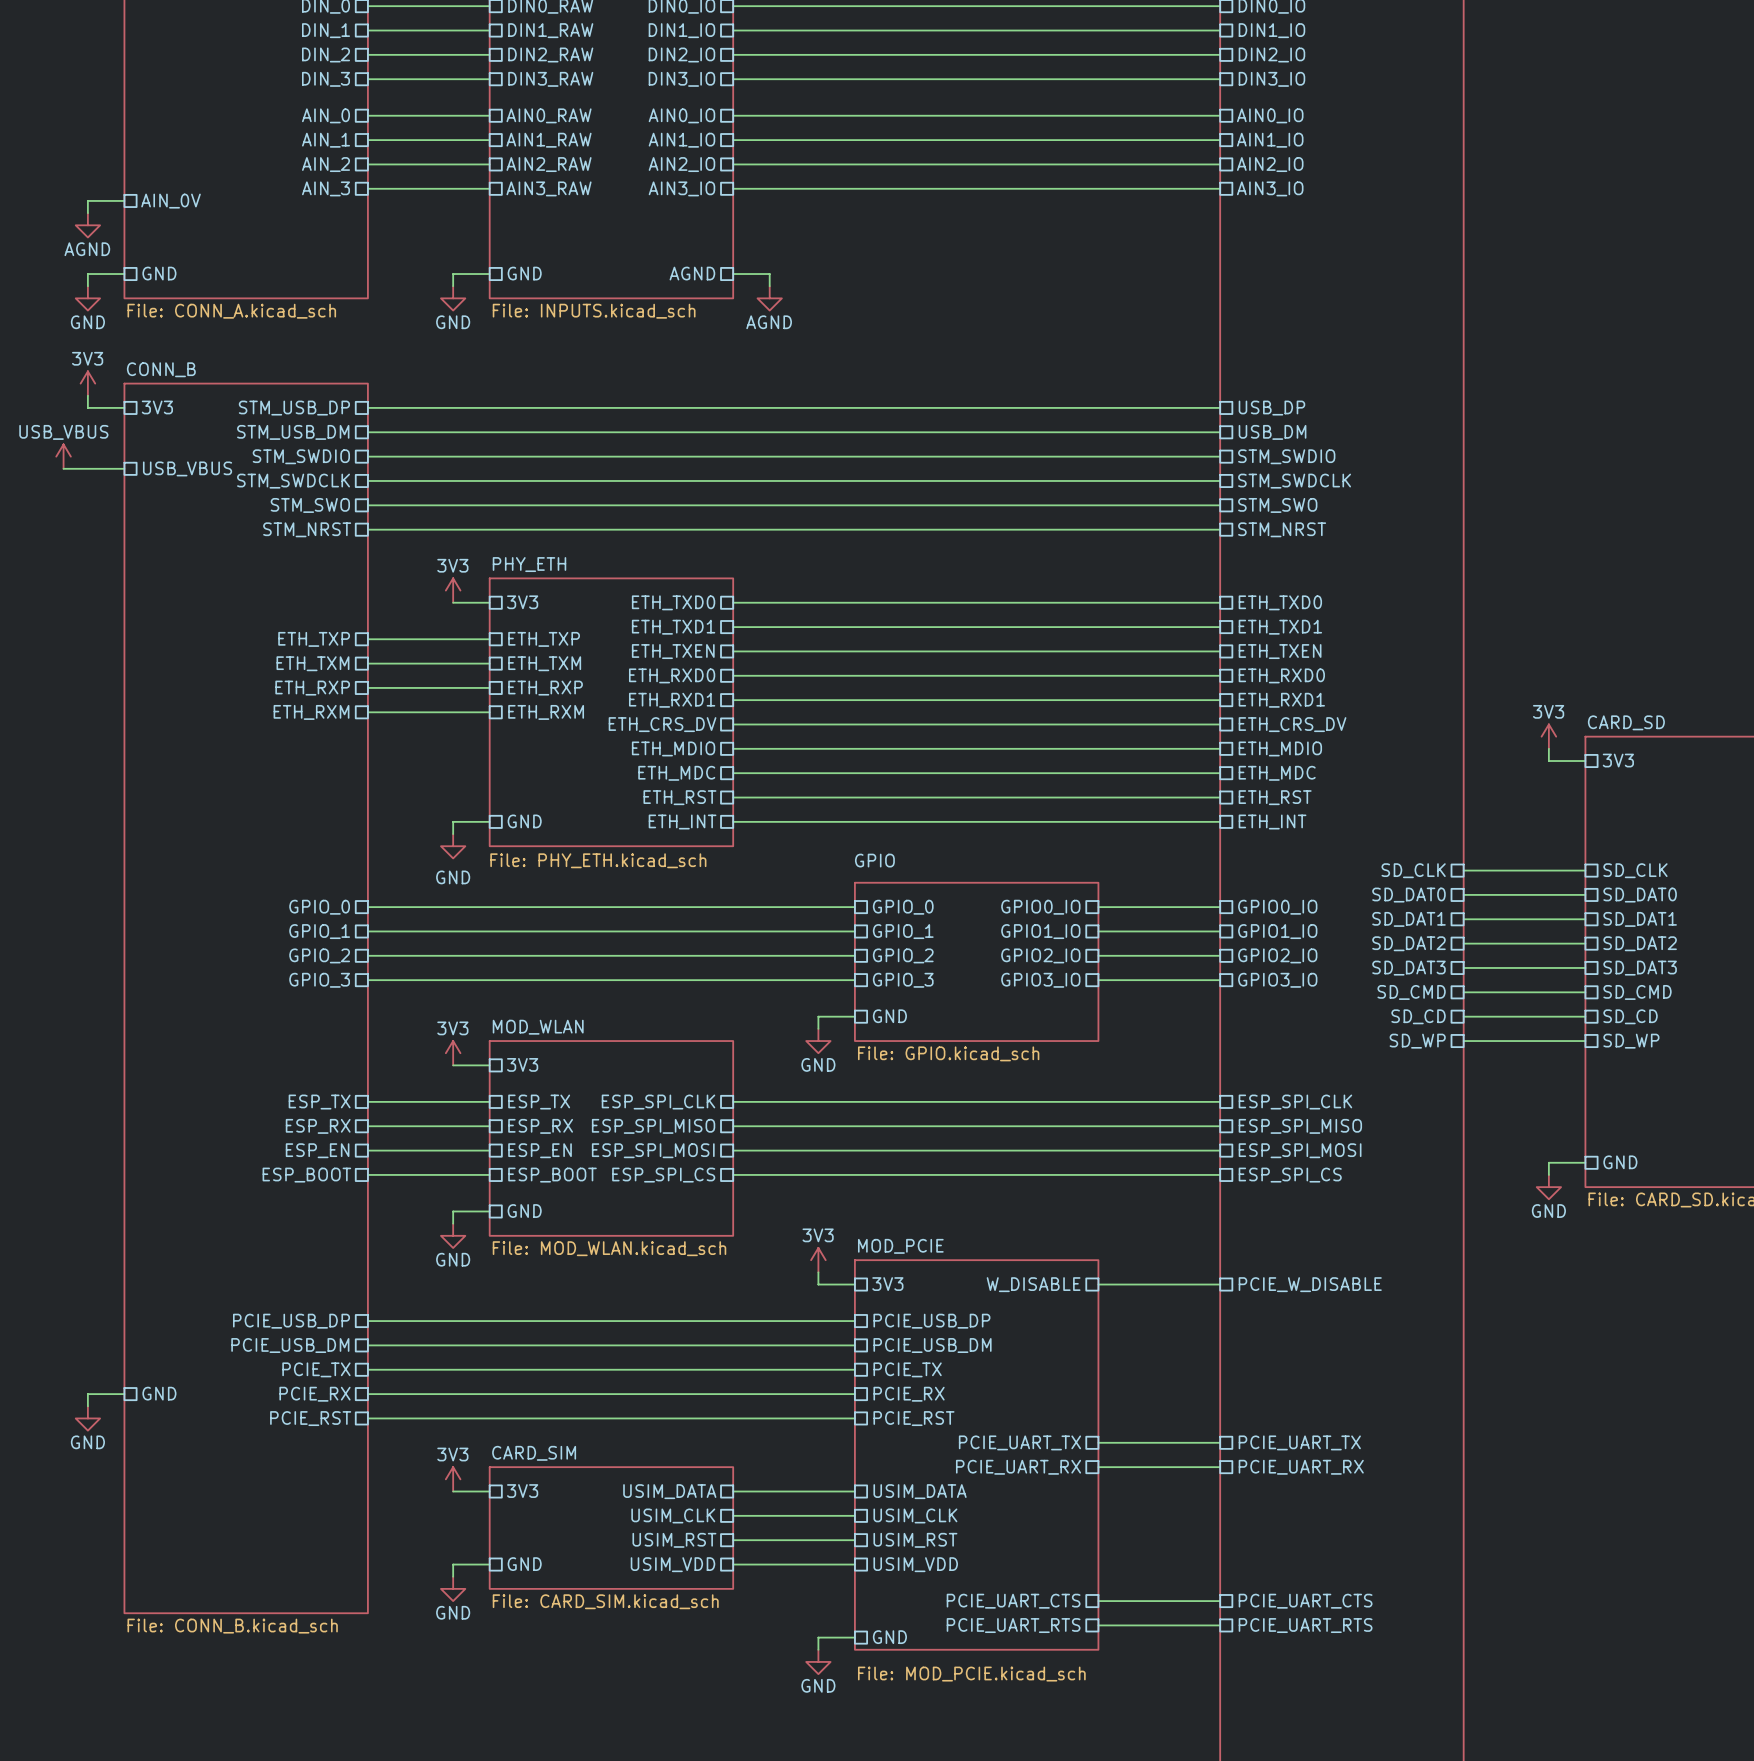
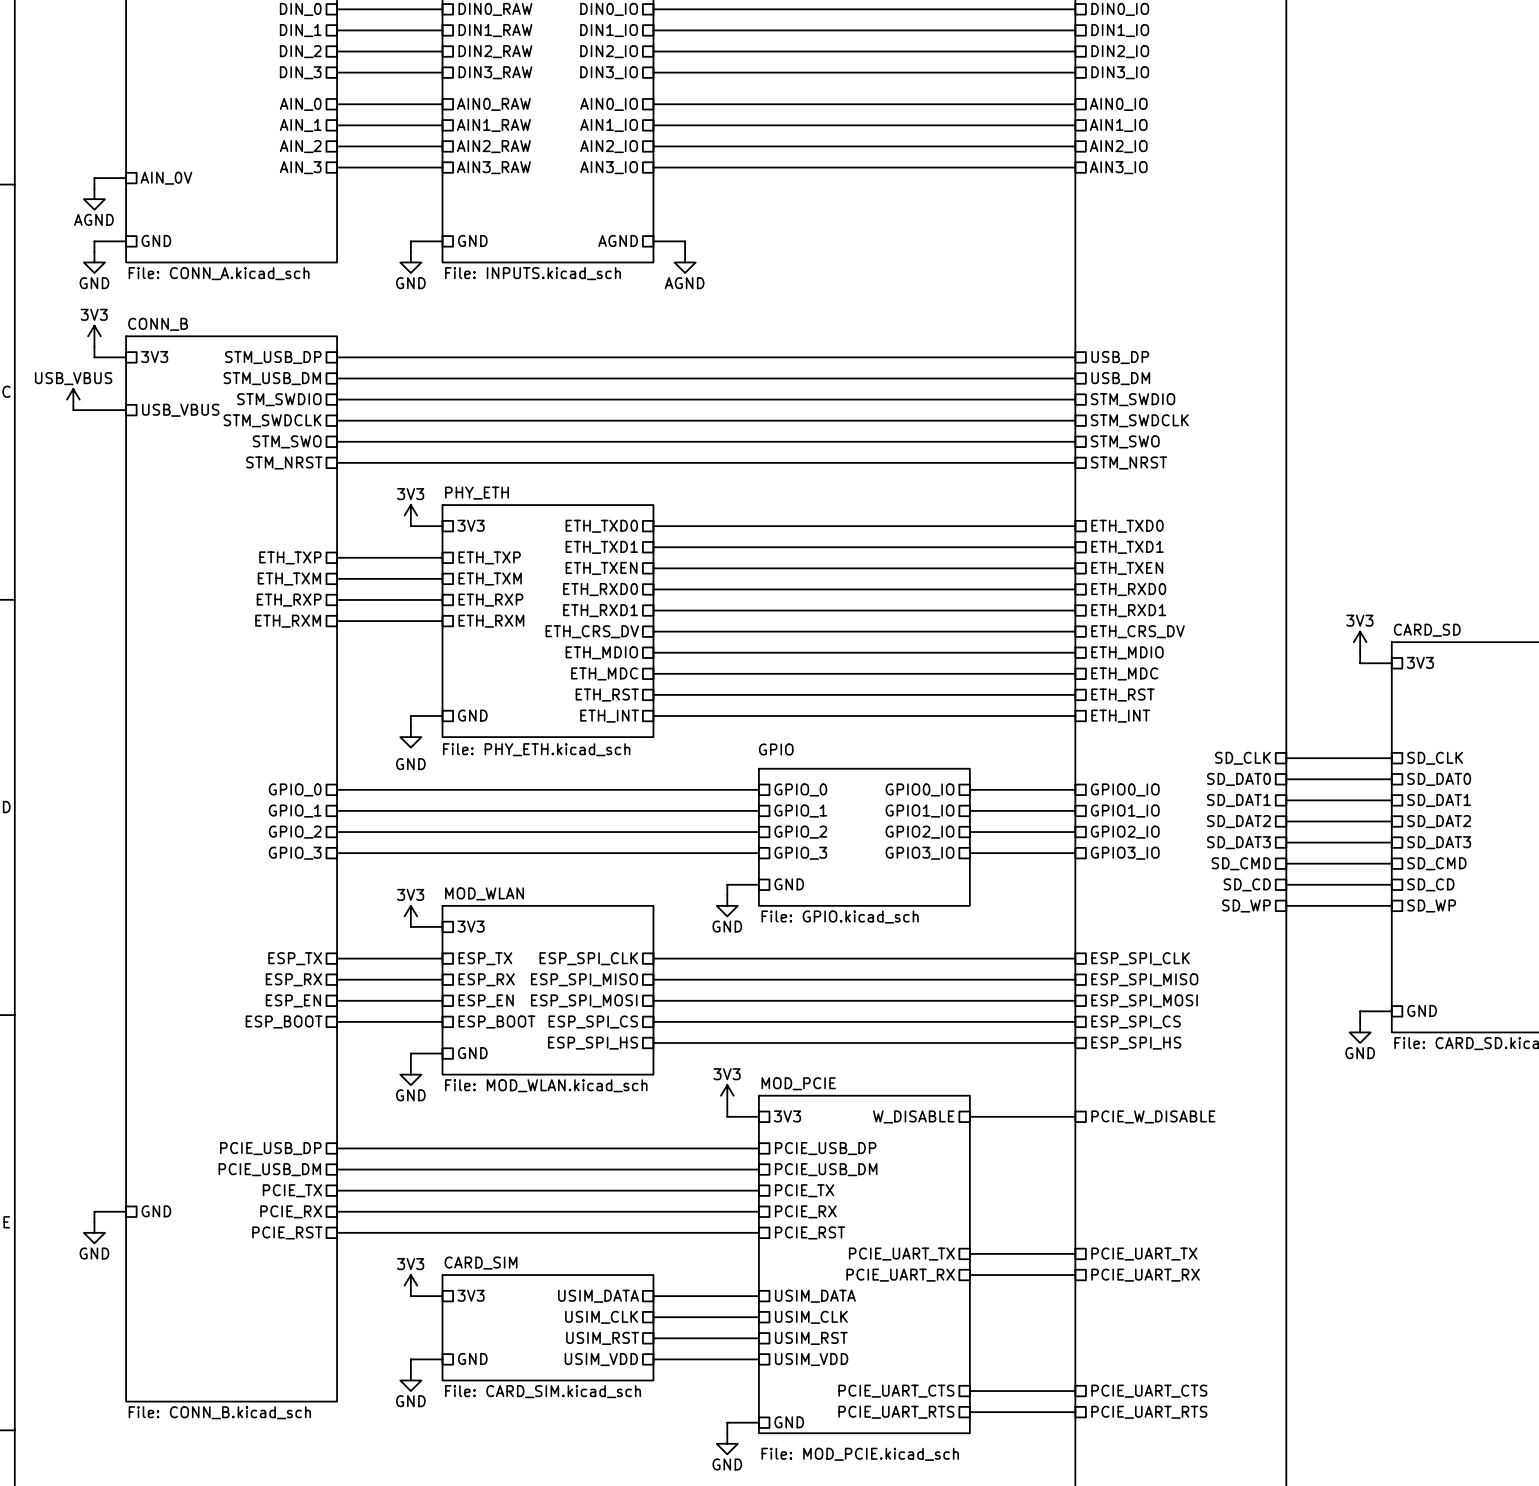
sheet pin: none -> ESP_SPI_HS (593, 1043)
wire: none -> (653, 1042) (1075, 1042)
sheet pin: none -> ESP_SPI_HS (1136, 1043)

